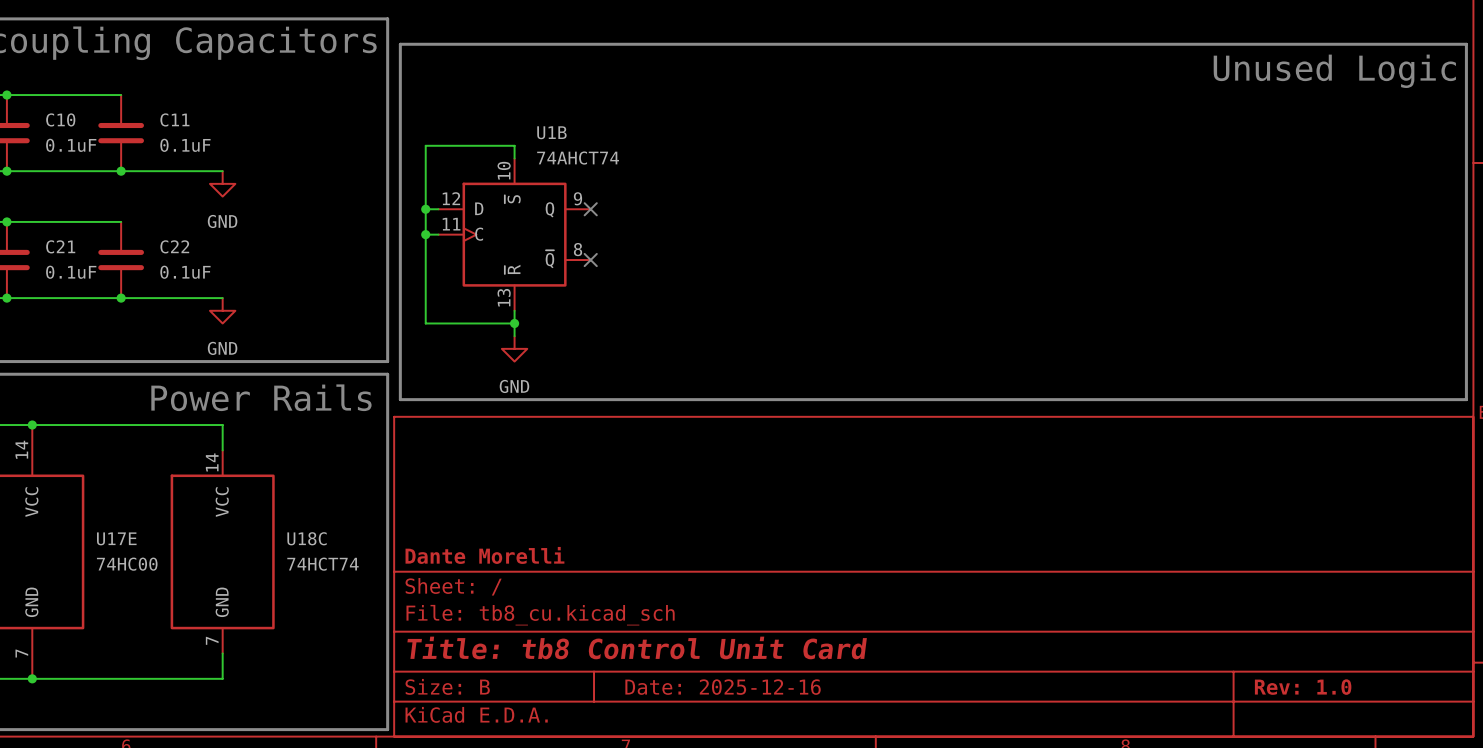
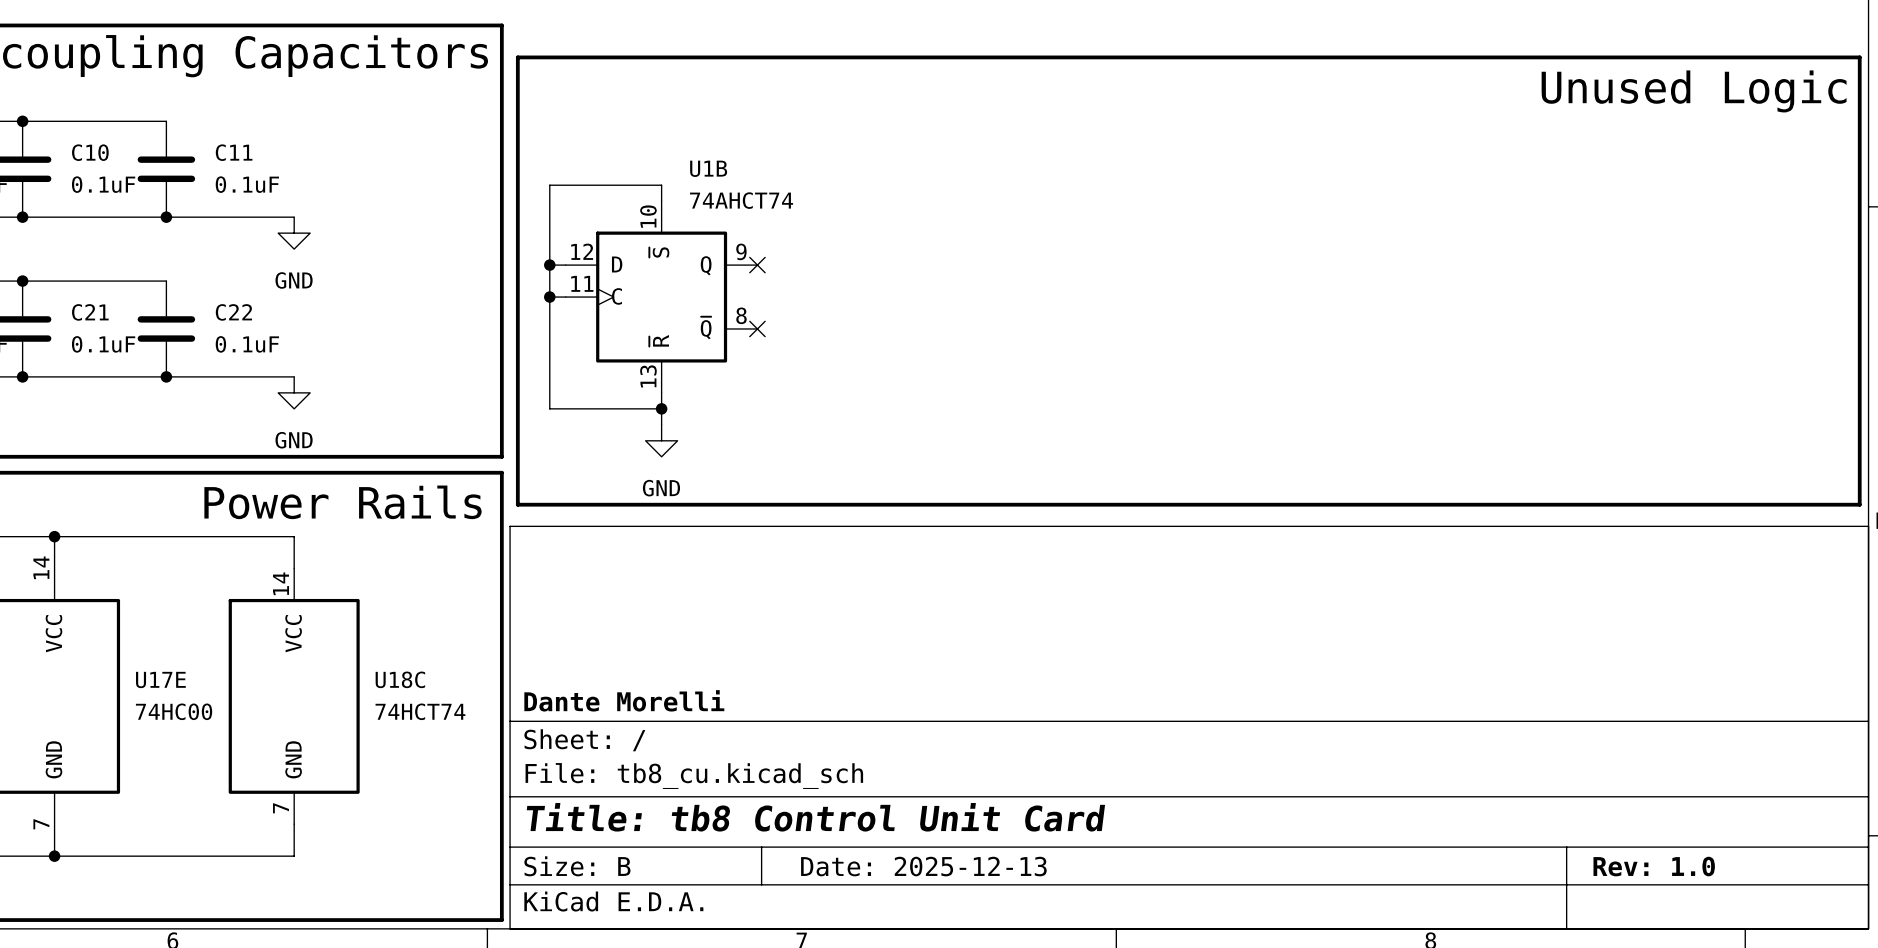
title block: Date: 2025-12-16 (723, 687) -> Date: 2025-12-13 (923, 866)

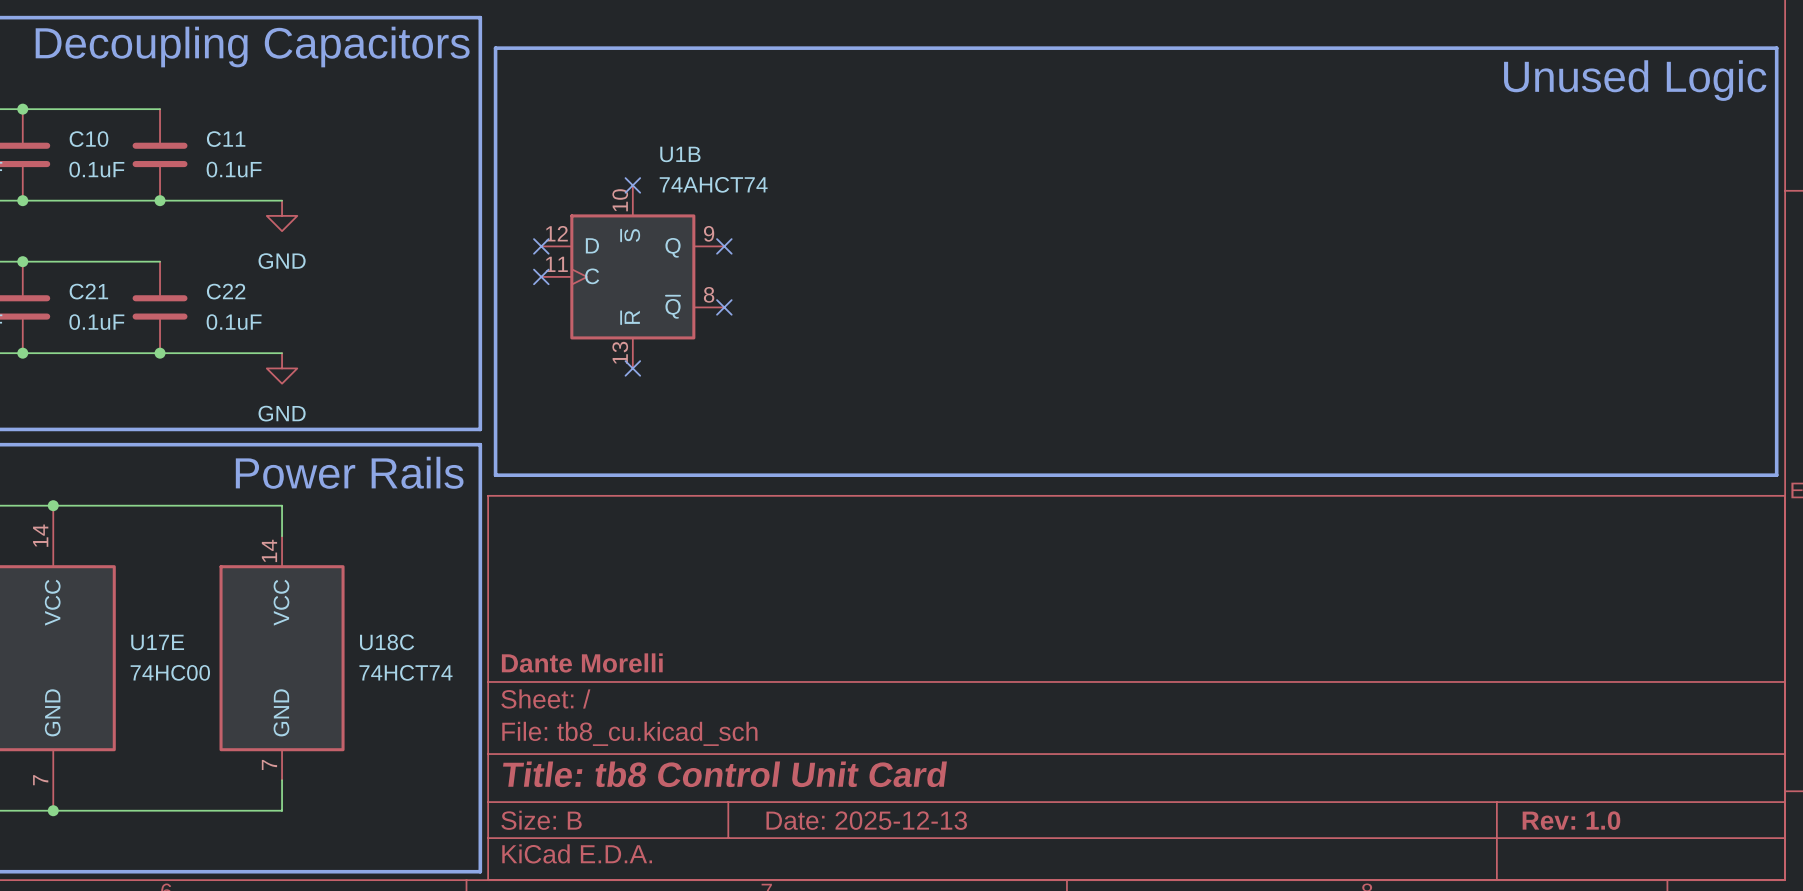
wire: (661, 201) (661, 185) (549, 185) (549, 408) (661, 408) -> none
no-connect mark: none -> (632, 185)
wire: (549, 265) (565, 265) -> none
junction: (549, 265) -> none
no-connect mark: none -> (541, 246)
wire: (549, 297) (565, 297) -> none
junction: (549, 297) -> none
no-connect mark: none -> (541, 276)
wire: (661, 392) (661, 424) -> none
no-connect mark: none -> (632, 368)
junction: (661, 408) -> none
power symbol: GND (661, 440) -> none

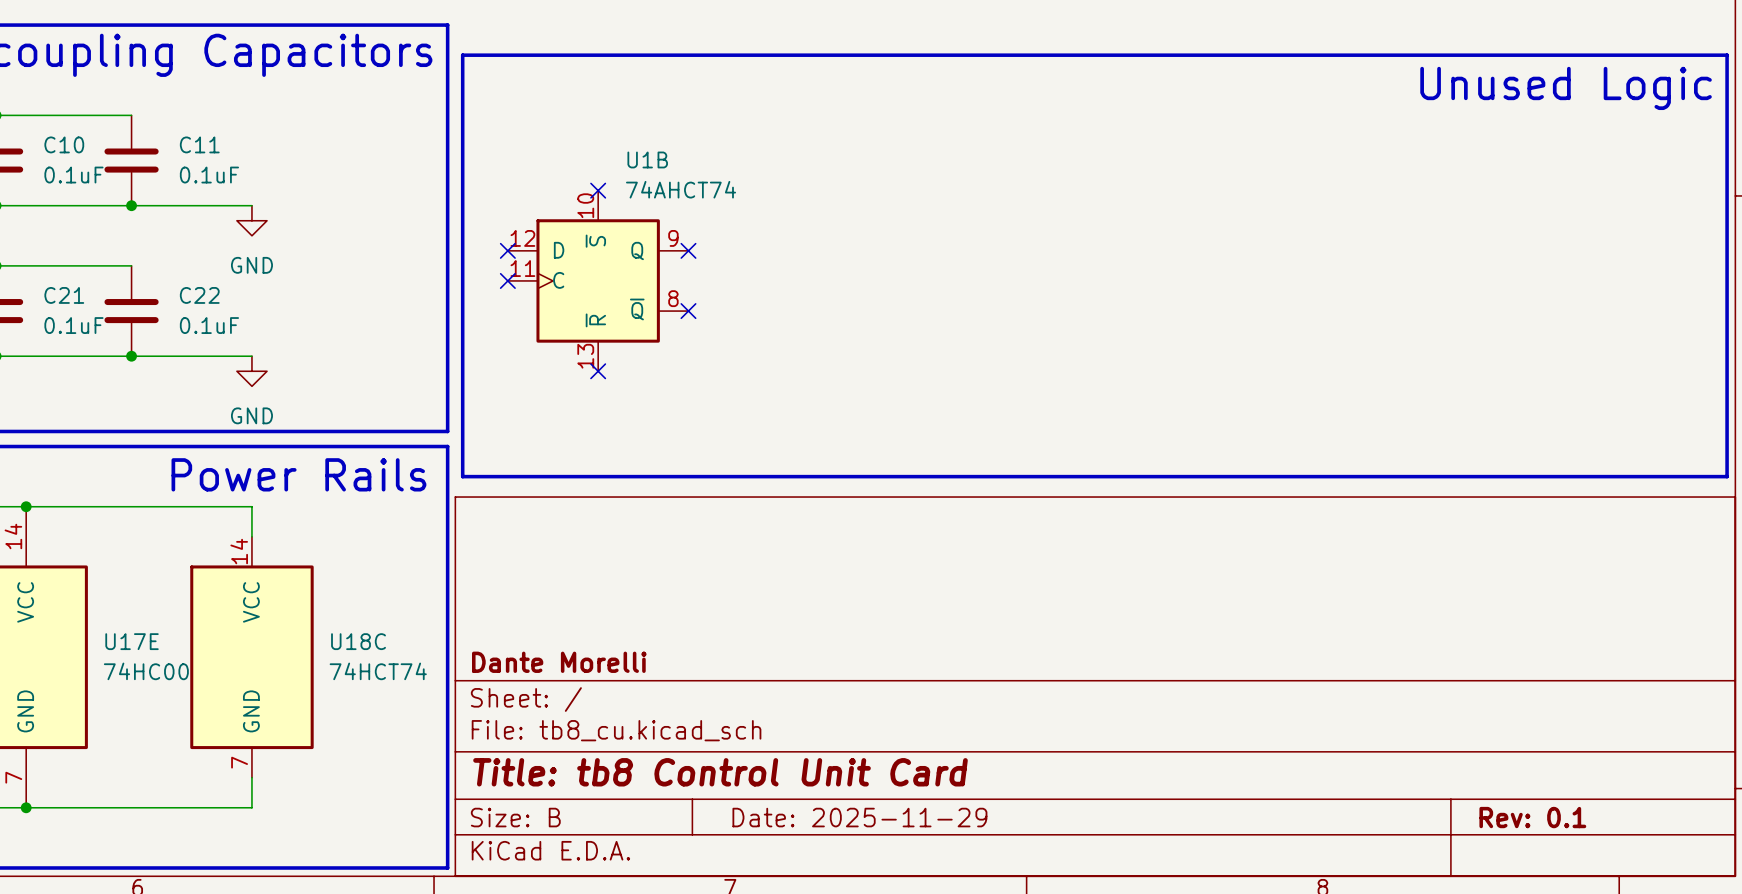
title block: Date: 2025-12-13 (866, 820) -> Date: 2025-11-29 (859, 817)
title block: Rev: 1.0 (1571, 820) -> Rev: 0.1 (1532, 817)

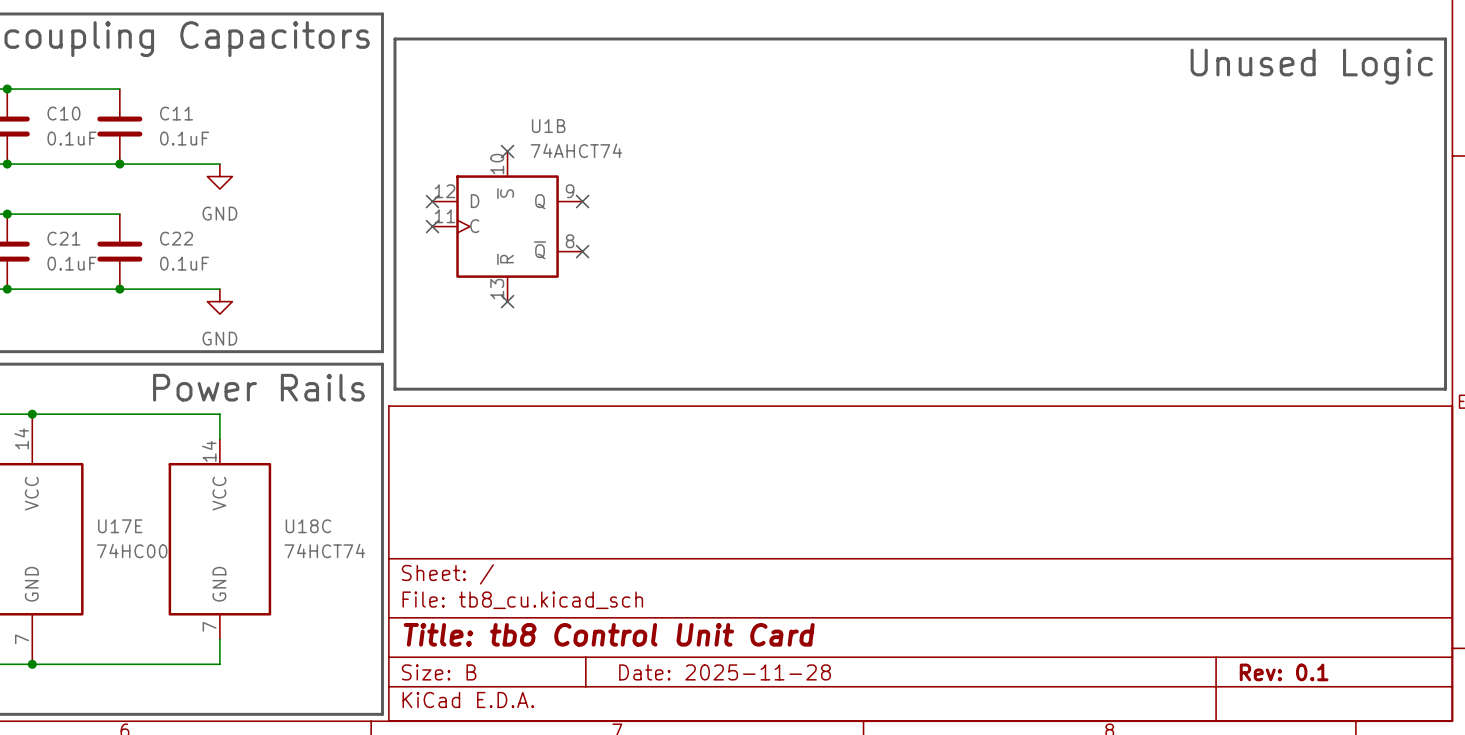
title block: Dante Morelli (559, 662) -> none
title block: Date: 2025-11-29 (859, 817) -> Date: 2025-11-28 (725, 672)

